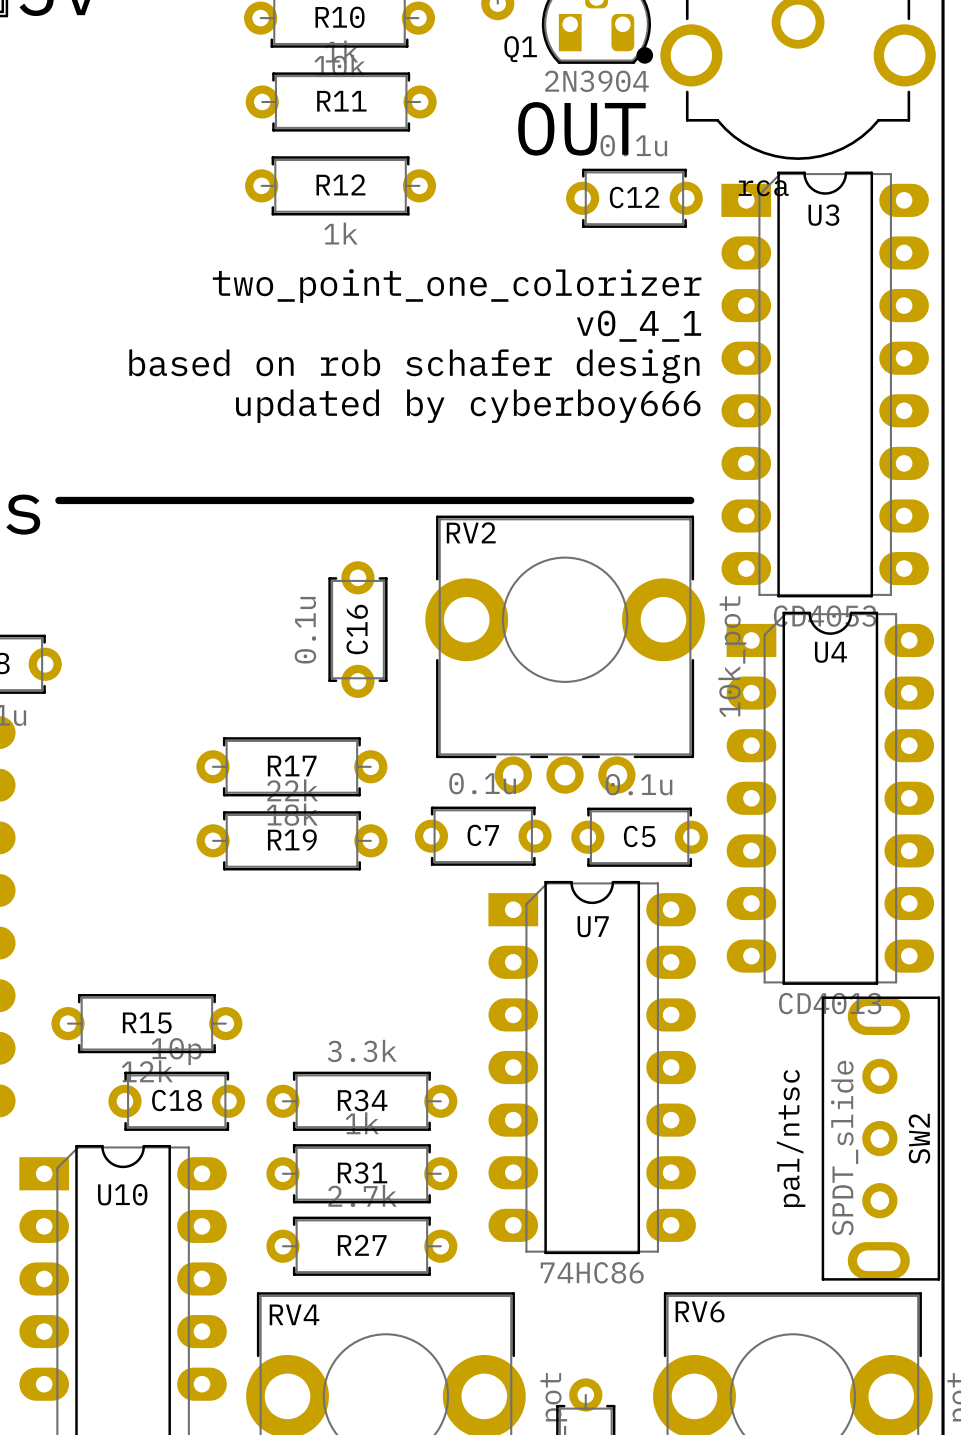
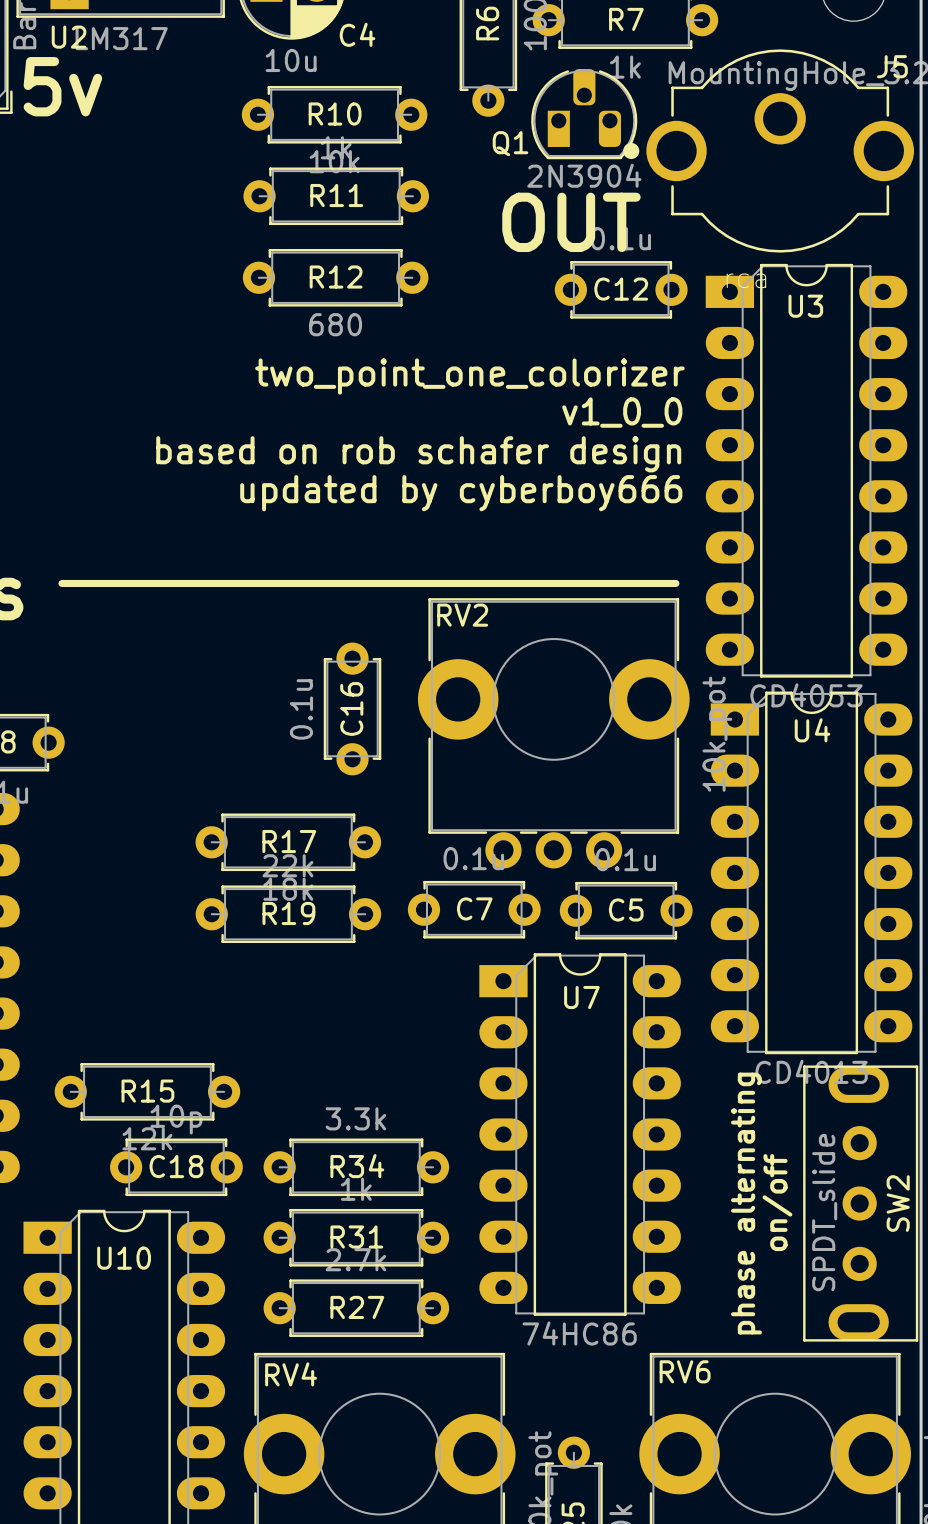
R12 value: 1k (340, 233) -> 680 (335, 324)
text: v0_4_1 (639, 326) -> v1_0_0 (622, 412)
text: none -> phase alternating (746, 1203)
text: pal/ntsc (791, 1138) -> on/off (777, 1202)

